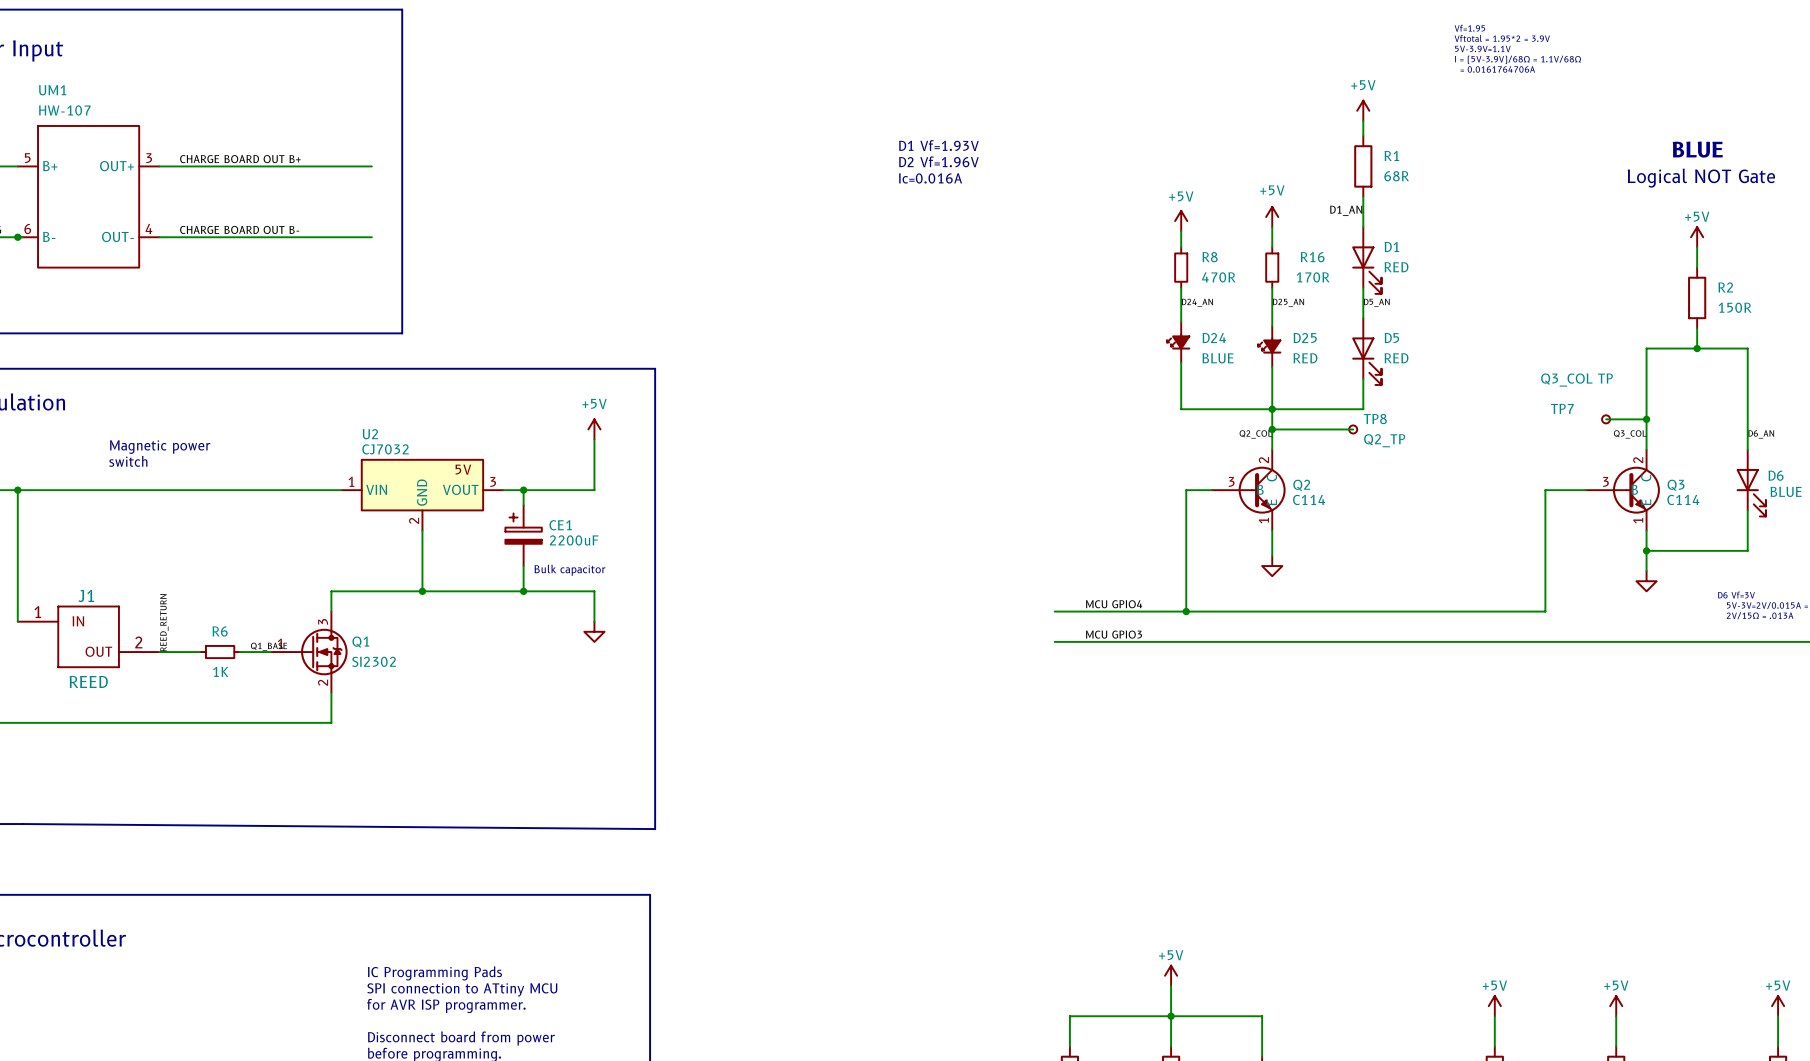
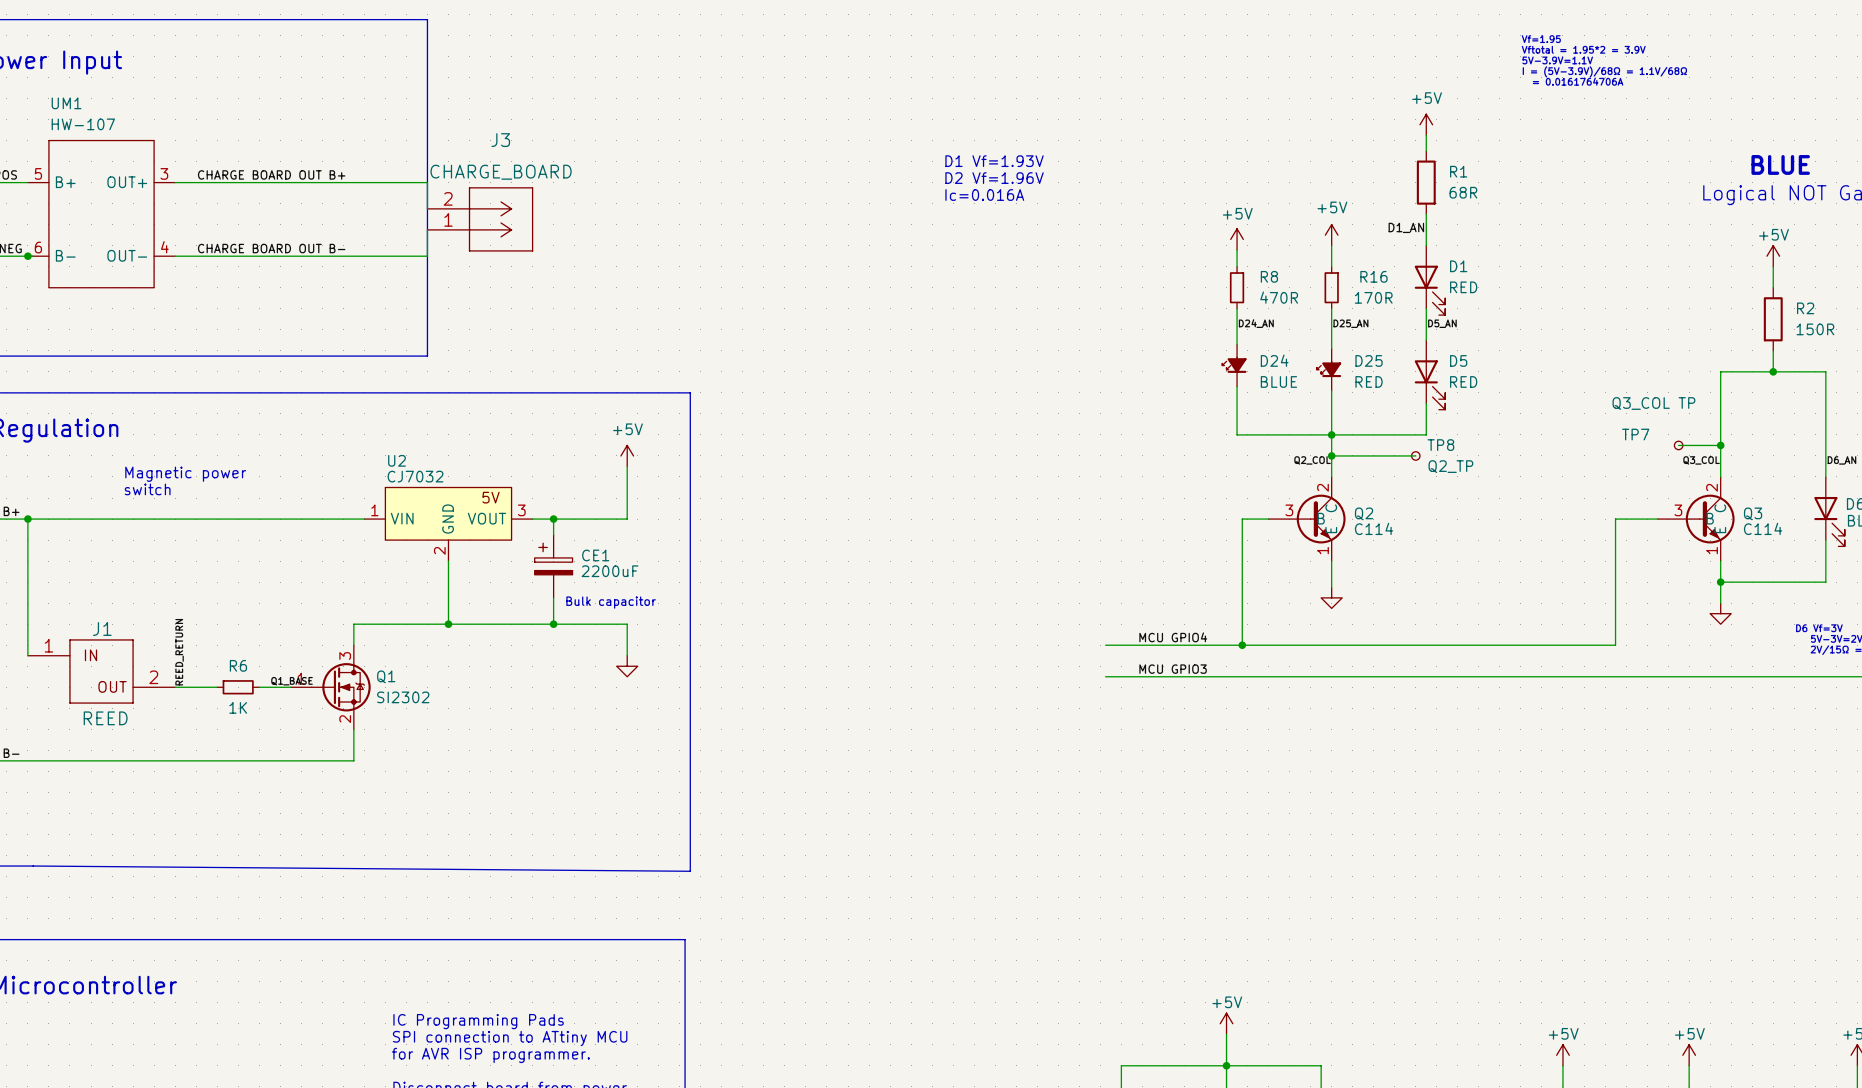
wire: none -> (395, 182) (427, 182) (427, 208)
J3: none -> CHARGE_BOARD (480, 219)
wire: none -> (427, 229) (427, 256) (395, 256)

